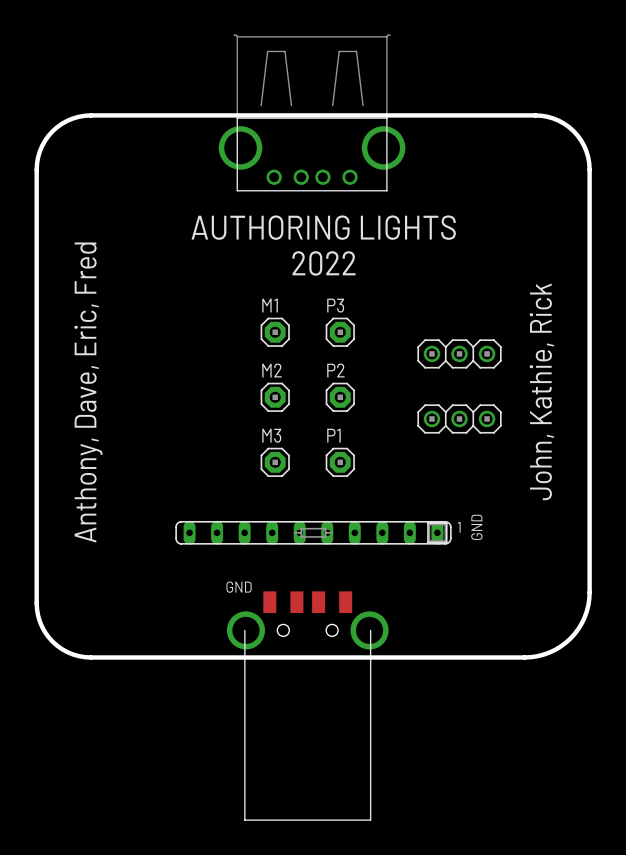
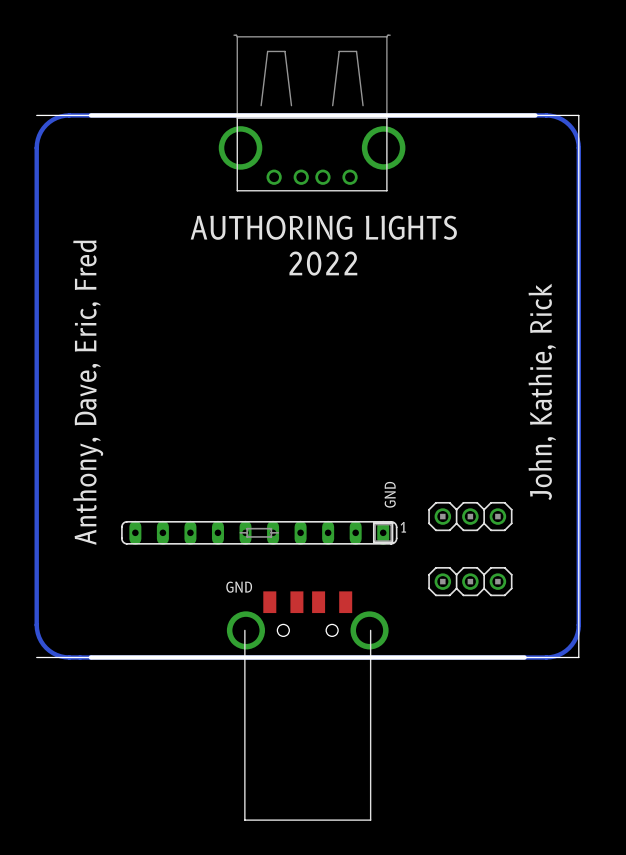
bottom track: none -> (69, 115) (546, 115) (558, 117) (569, 124) (576, 135) (578, 147) (578, 624) (576, 637) (569, 647) (558, 655) (546, 657) (69, 657) (56, 655) (46, 647) (39, 637) (36, 624) (36, 147) (39, 135) (46, 124) (56, 117) (69, 115)
board edge: (90, 115) (73, 118) (52, 131) (39, 151) (36, 169) (37, 609) (45, 632) (57, 645) (73, 654) (90, 657) -> (90, 115) (36, 115)
board edge: (535, 115) (553, 118) (569, 127) (581, 140) (589, 163) (589, 592) (584, 617) (570, 638) (549, 652) (524, 657) -> (535, 115) (578, 115) (578, 657) (524, 657)
M1: (275, 332) -> none
P3: (340, 332) -> none
part: (459, 353) -> none
M2: (275, 397) -> none
P2: (340, 397) -> none
part: (459, 418) -> none
M3: (275, 462) -> none
P1: (340, 462) -> none
part: none -> (470, 516)
text position: GND (476, 527) -> GND (390, 494)
part position: (313, 532) -> (259, 532)
part: none -> (470, 581)
board edge: none -> (36, 657) (90, 657)

